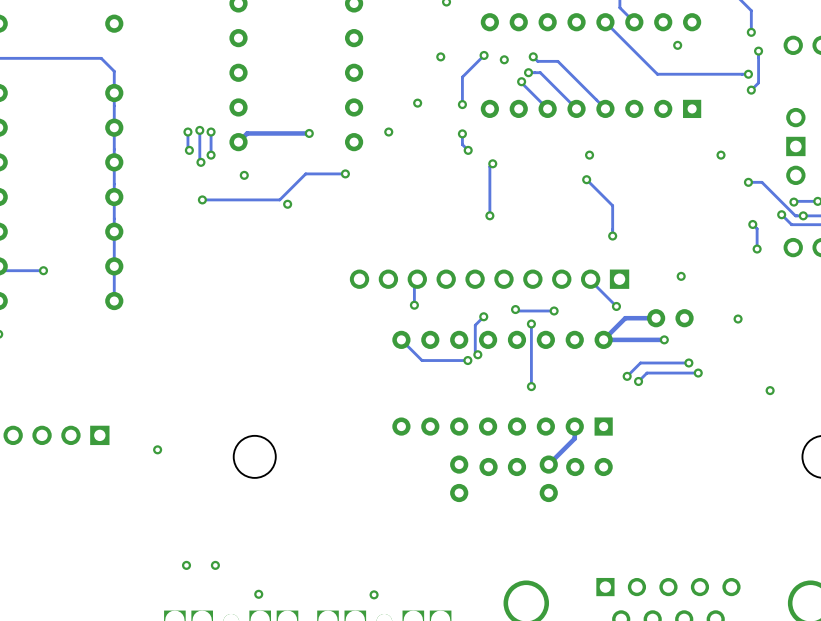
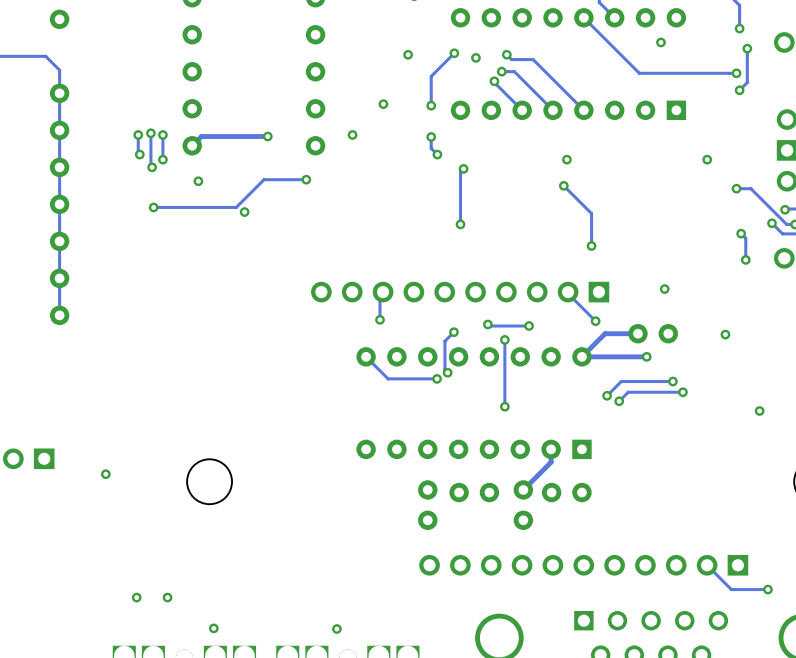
part: none -> (583, 565)
track: none -> (707, 565) (731, 589) (767, 589)
via: none -> (767, 589)

